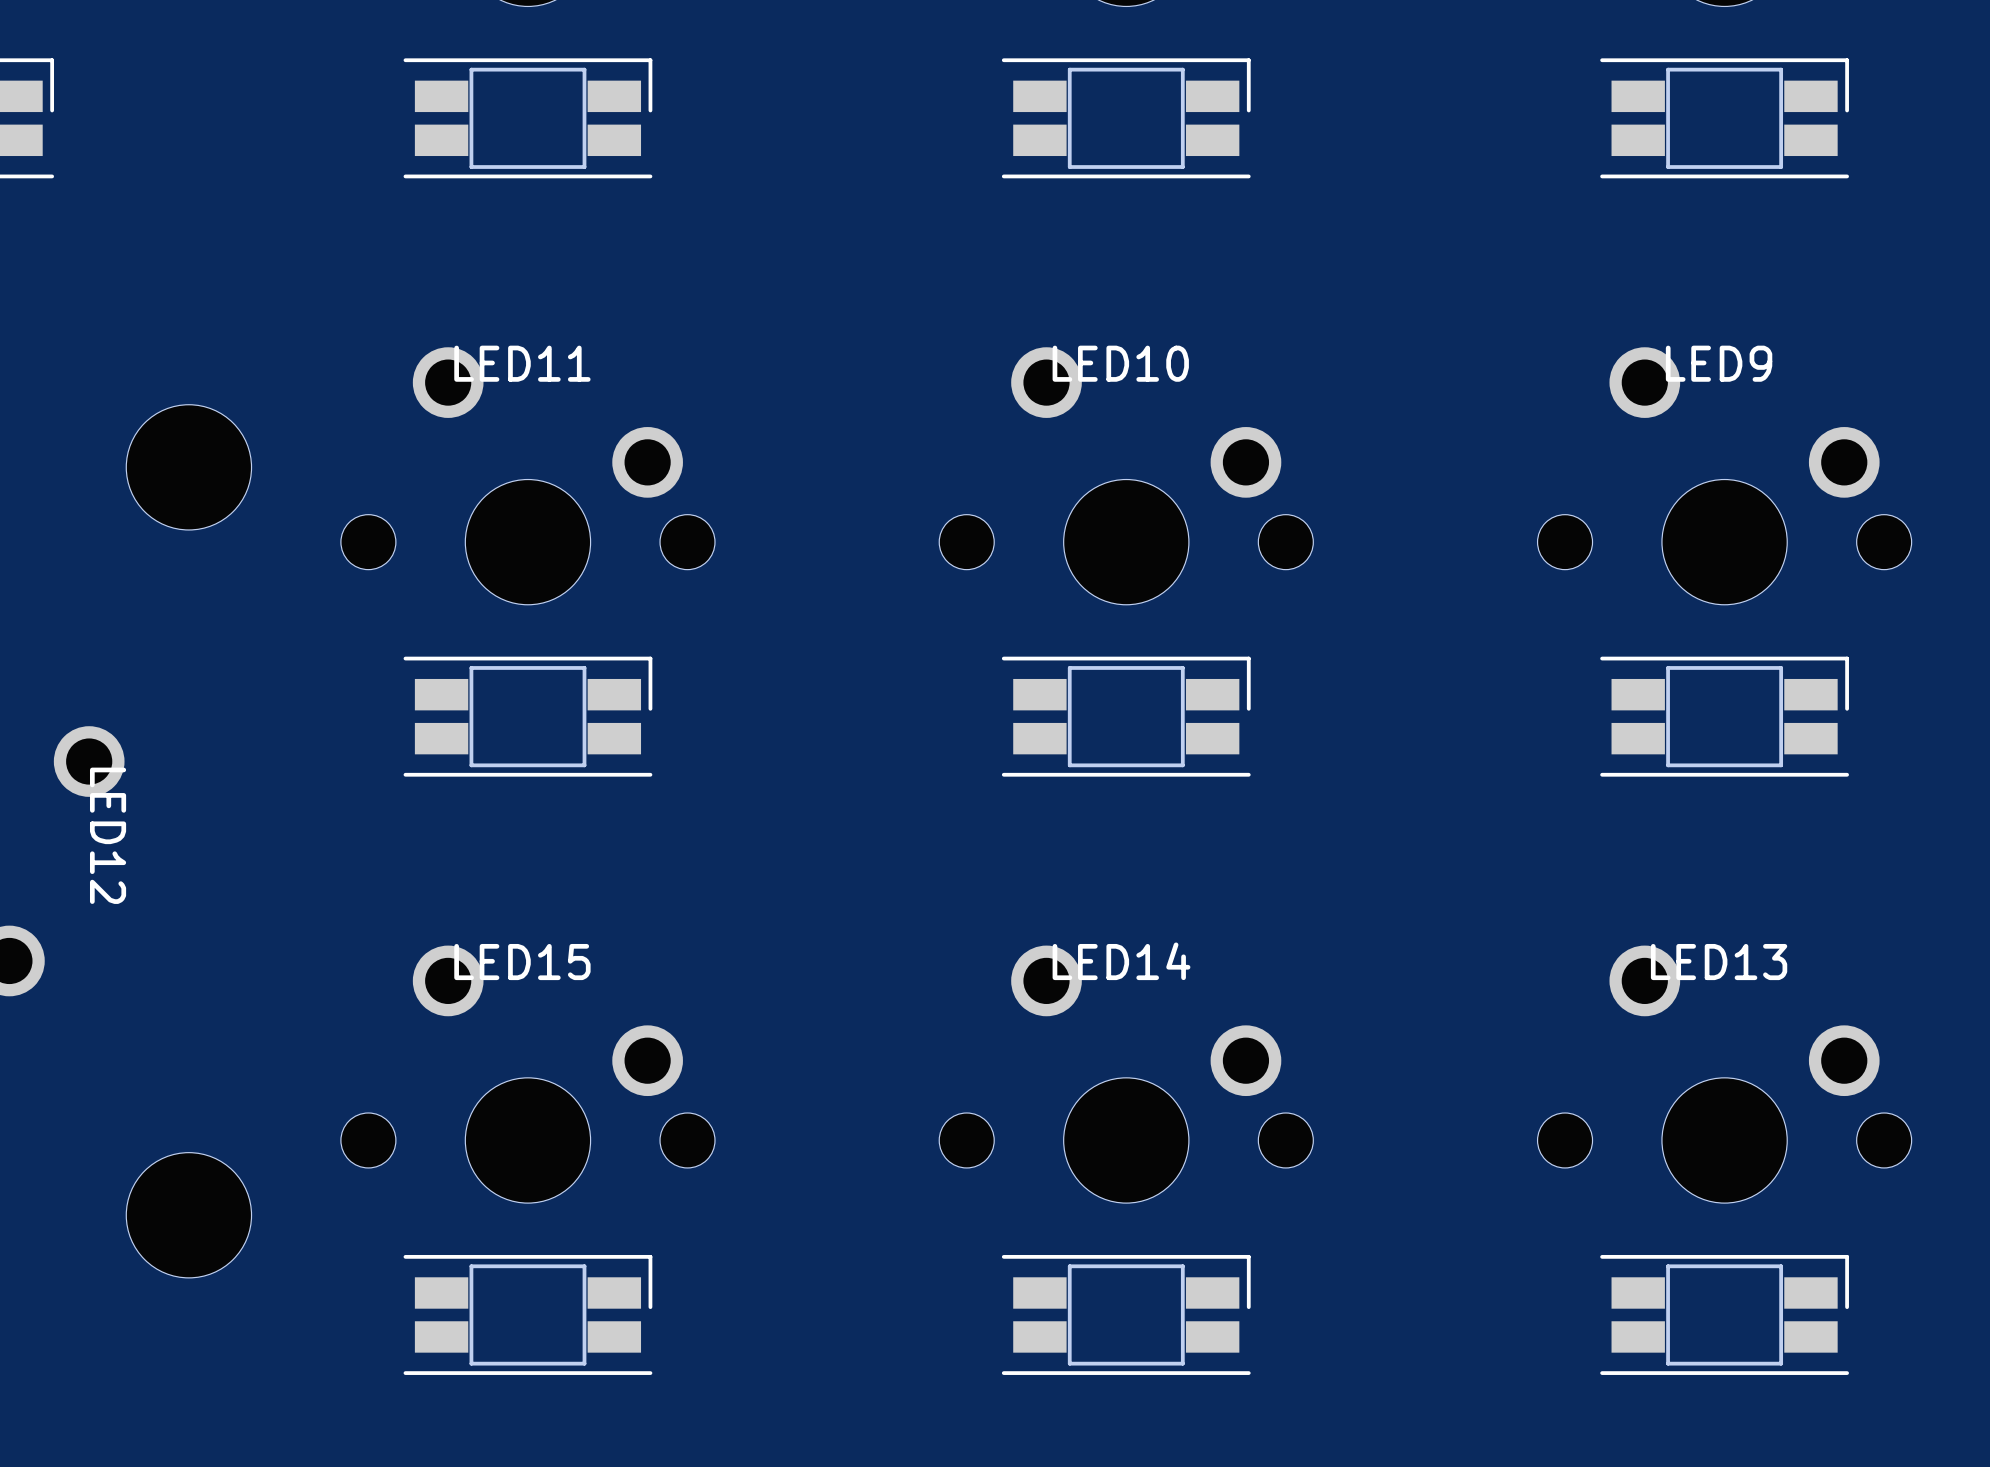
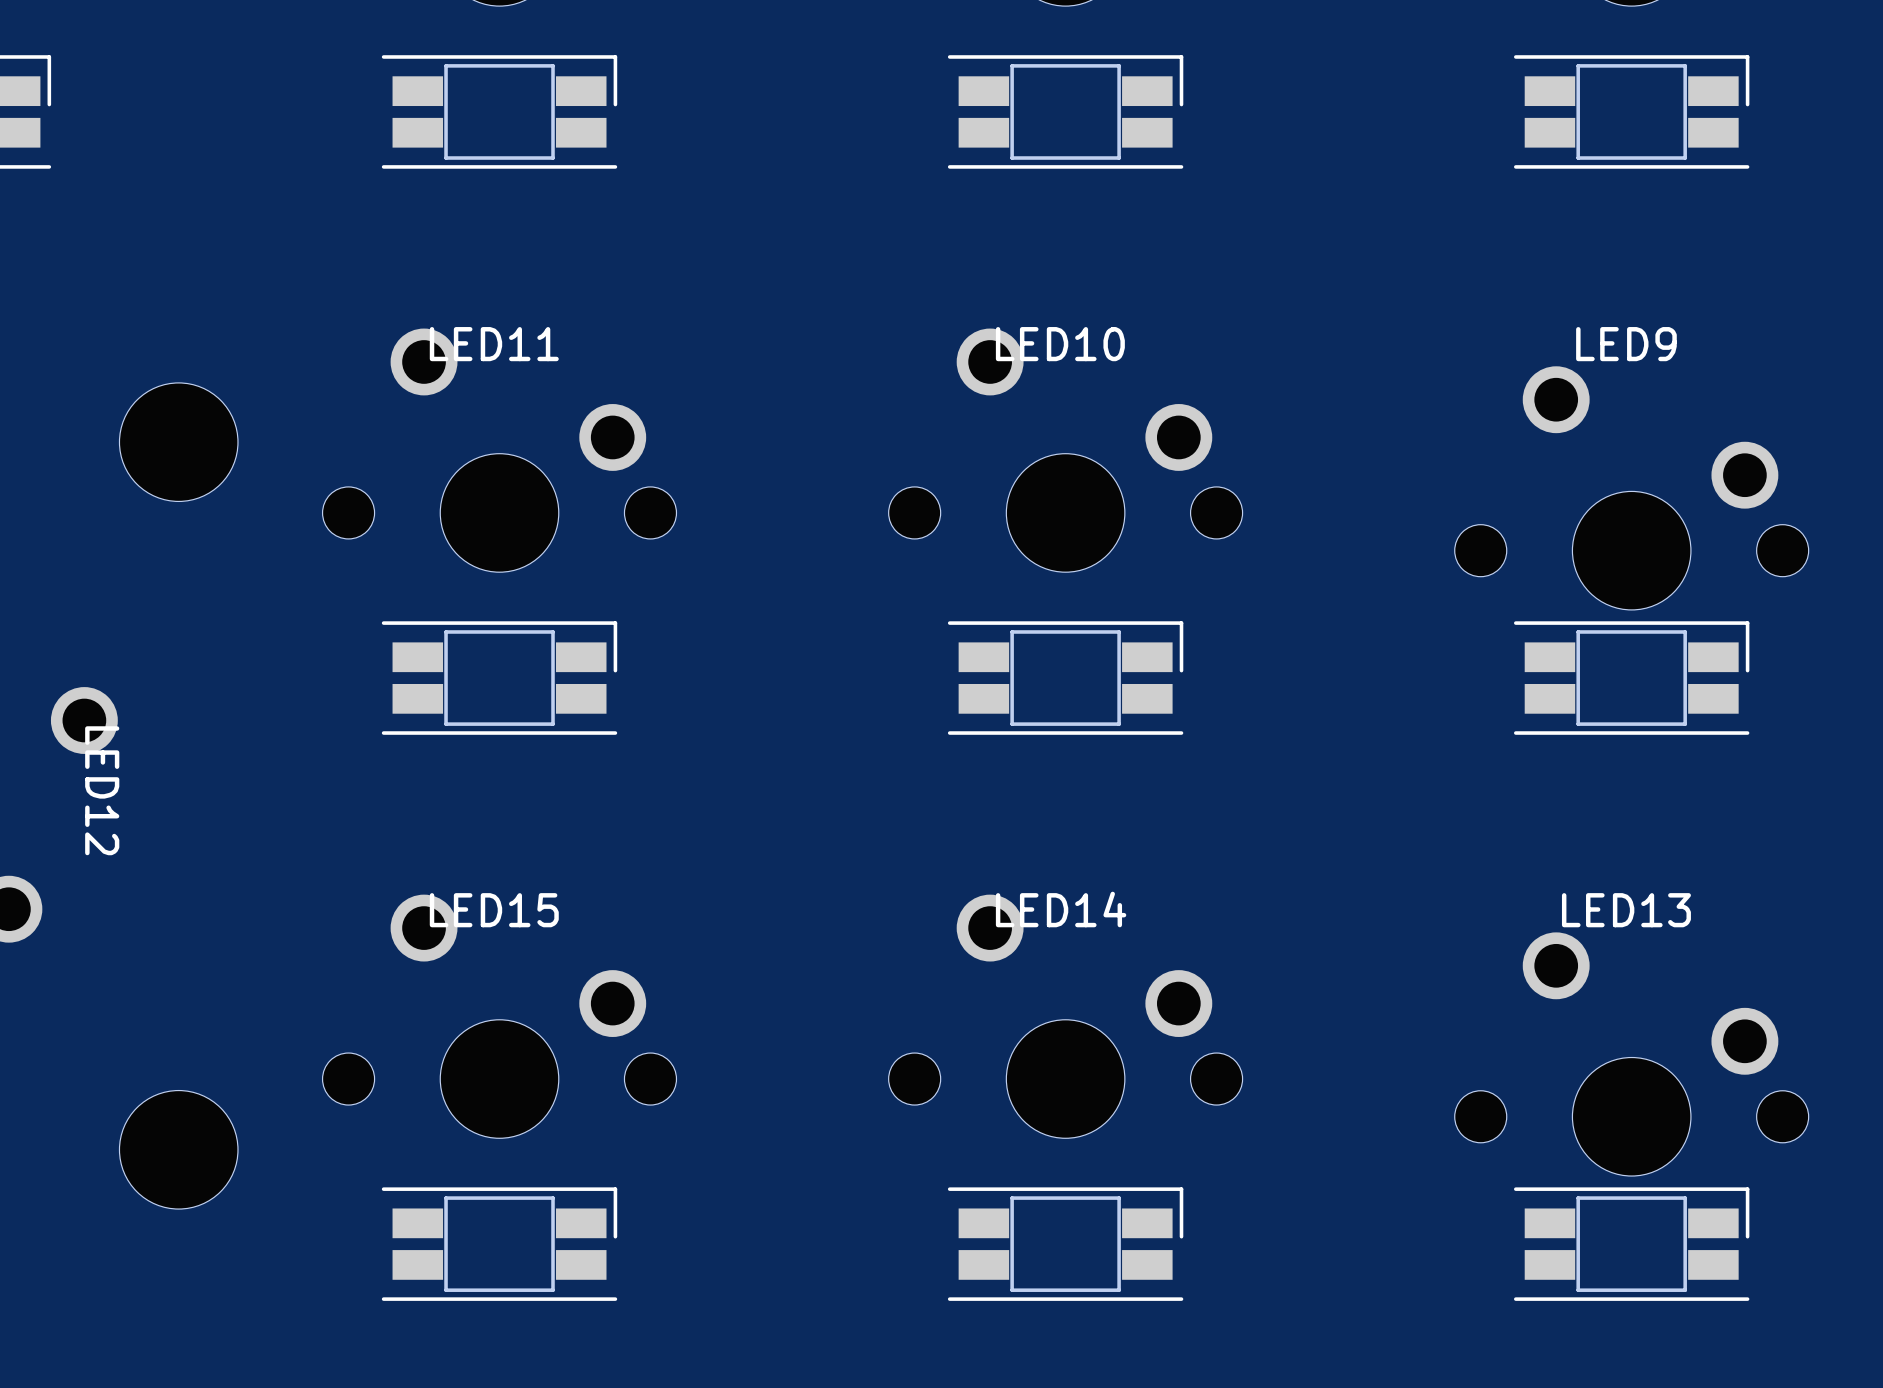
part position: (1724, 476) -> (1631, 488)
part position: (1724, 1074) -> (1631, 1054)

